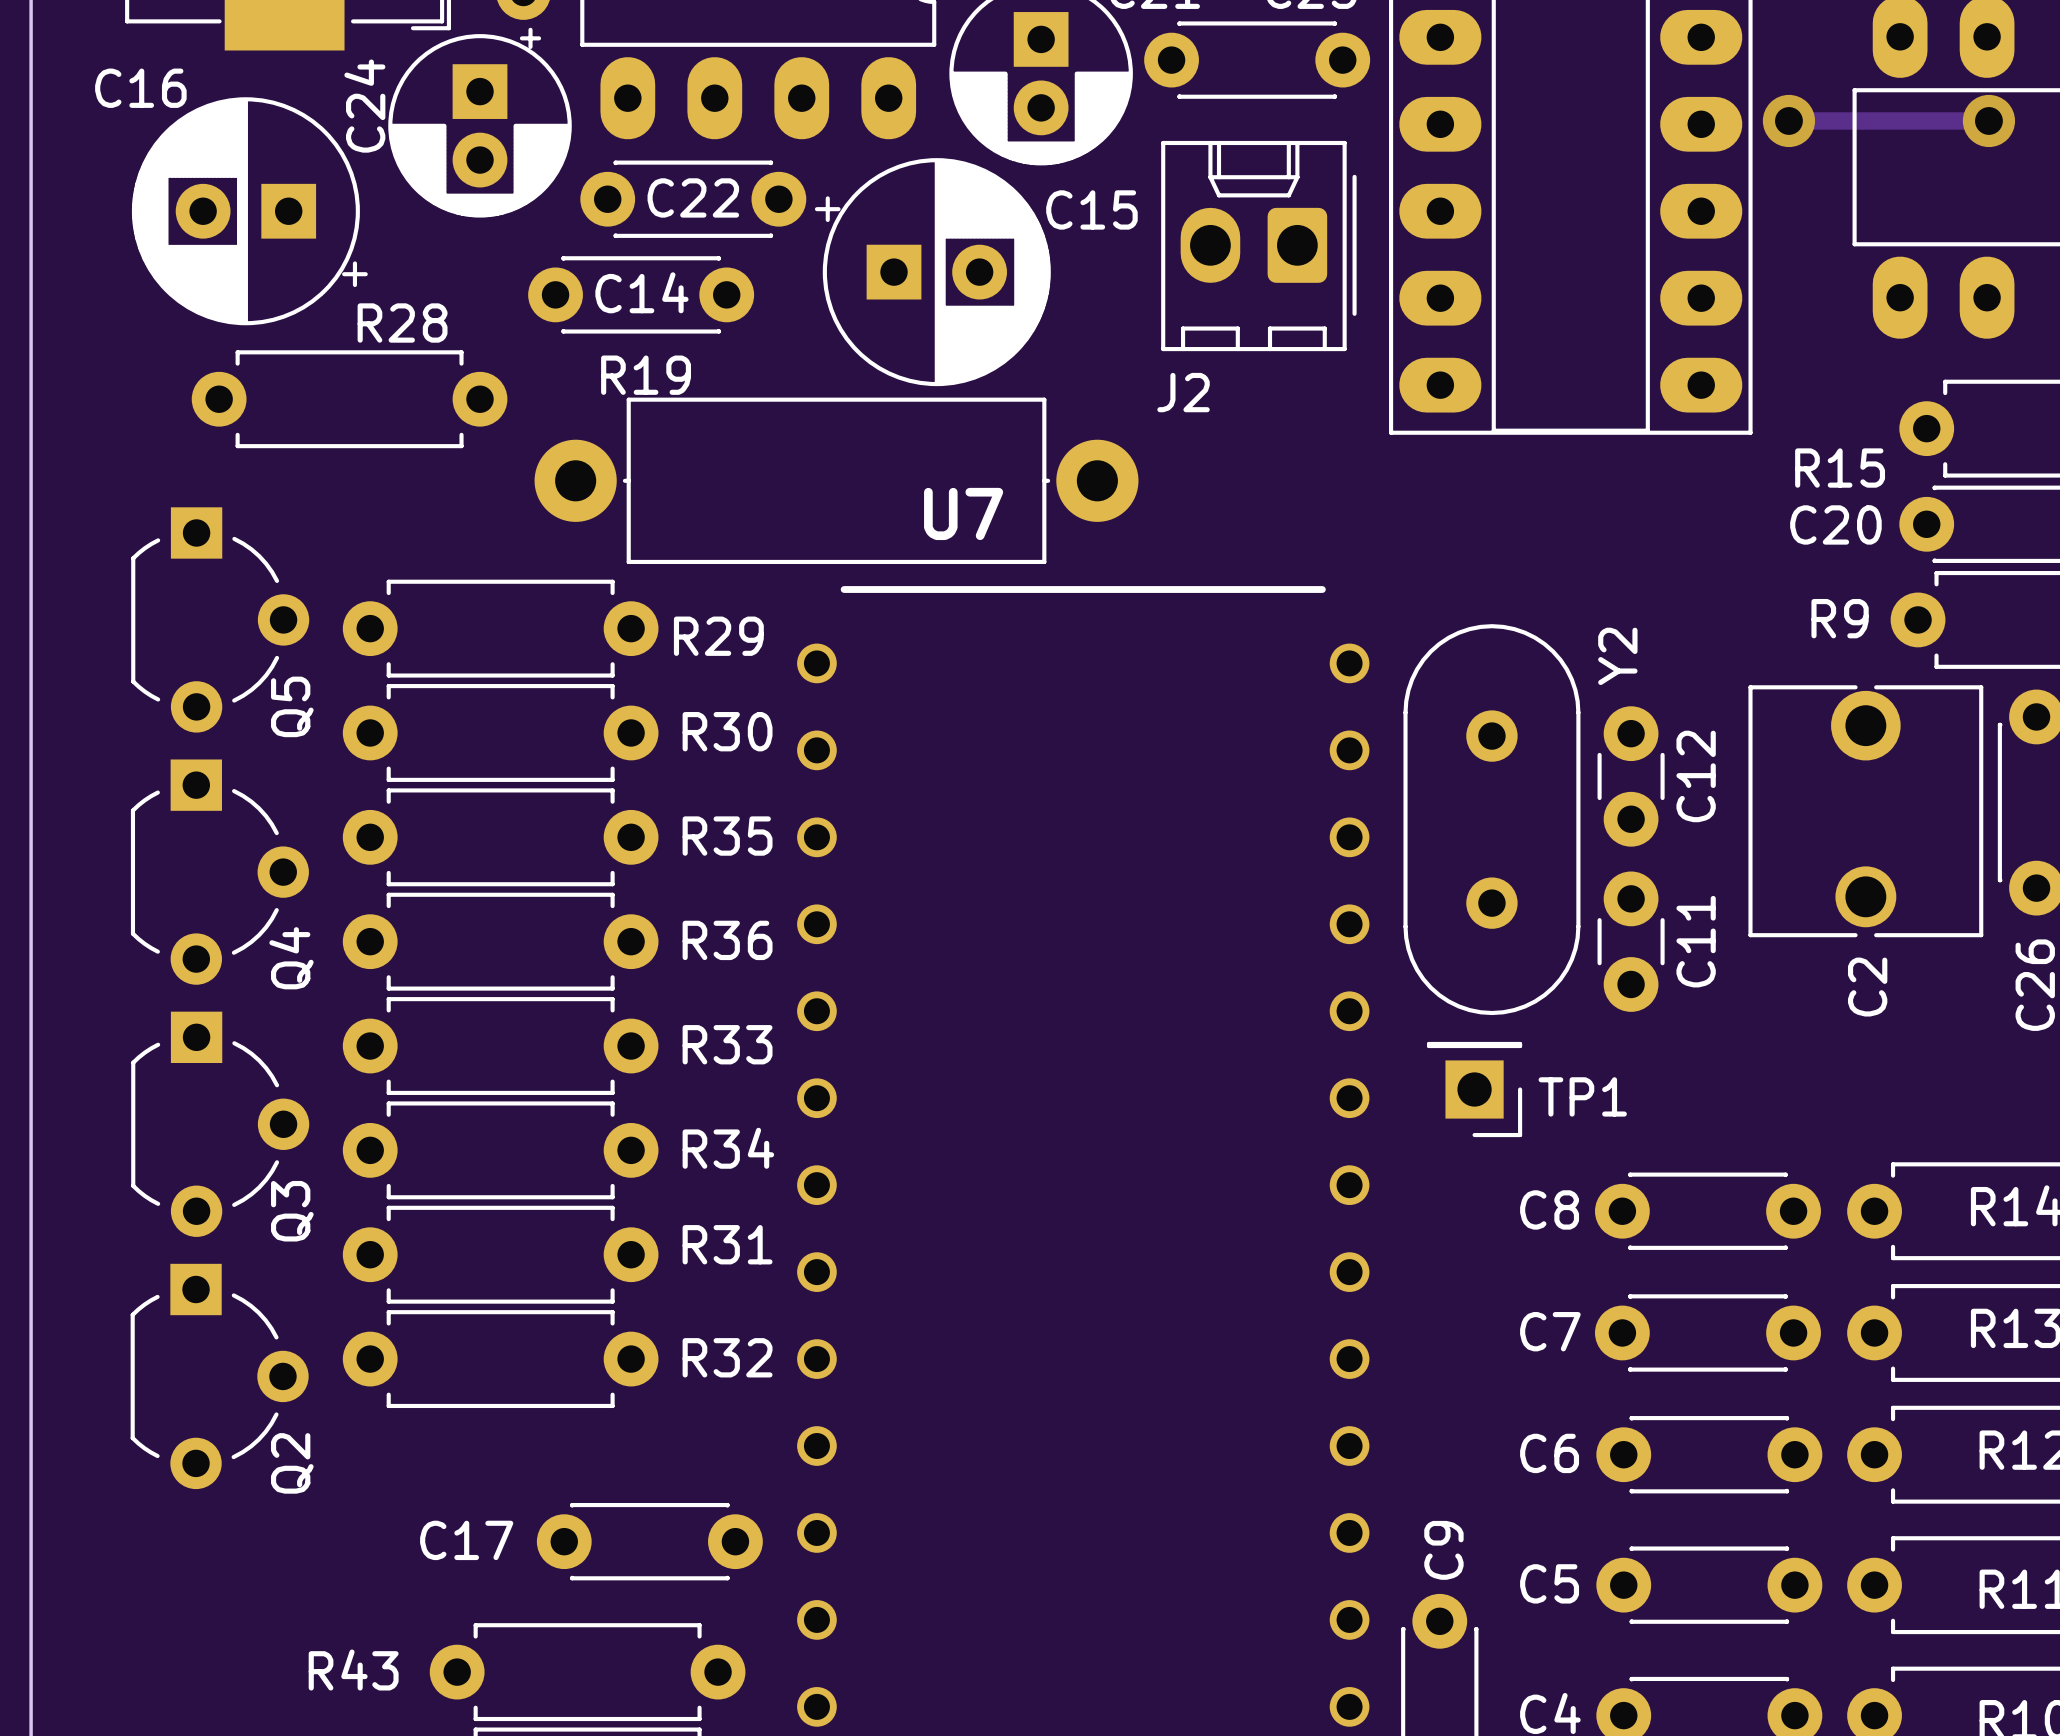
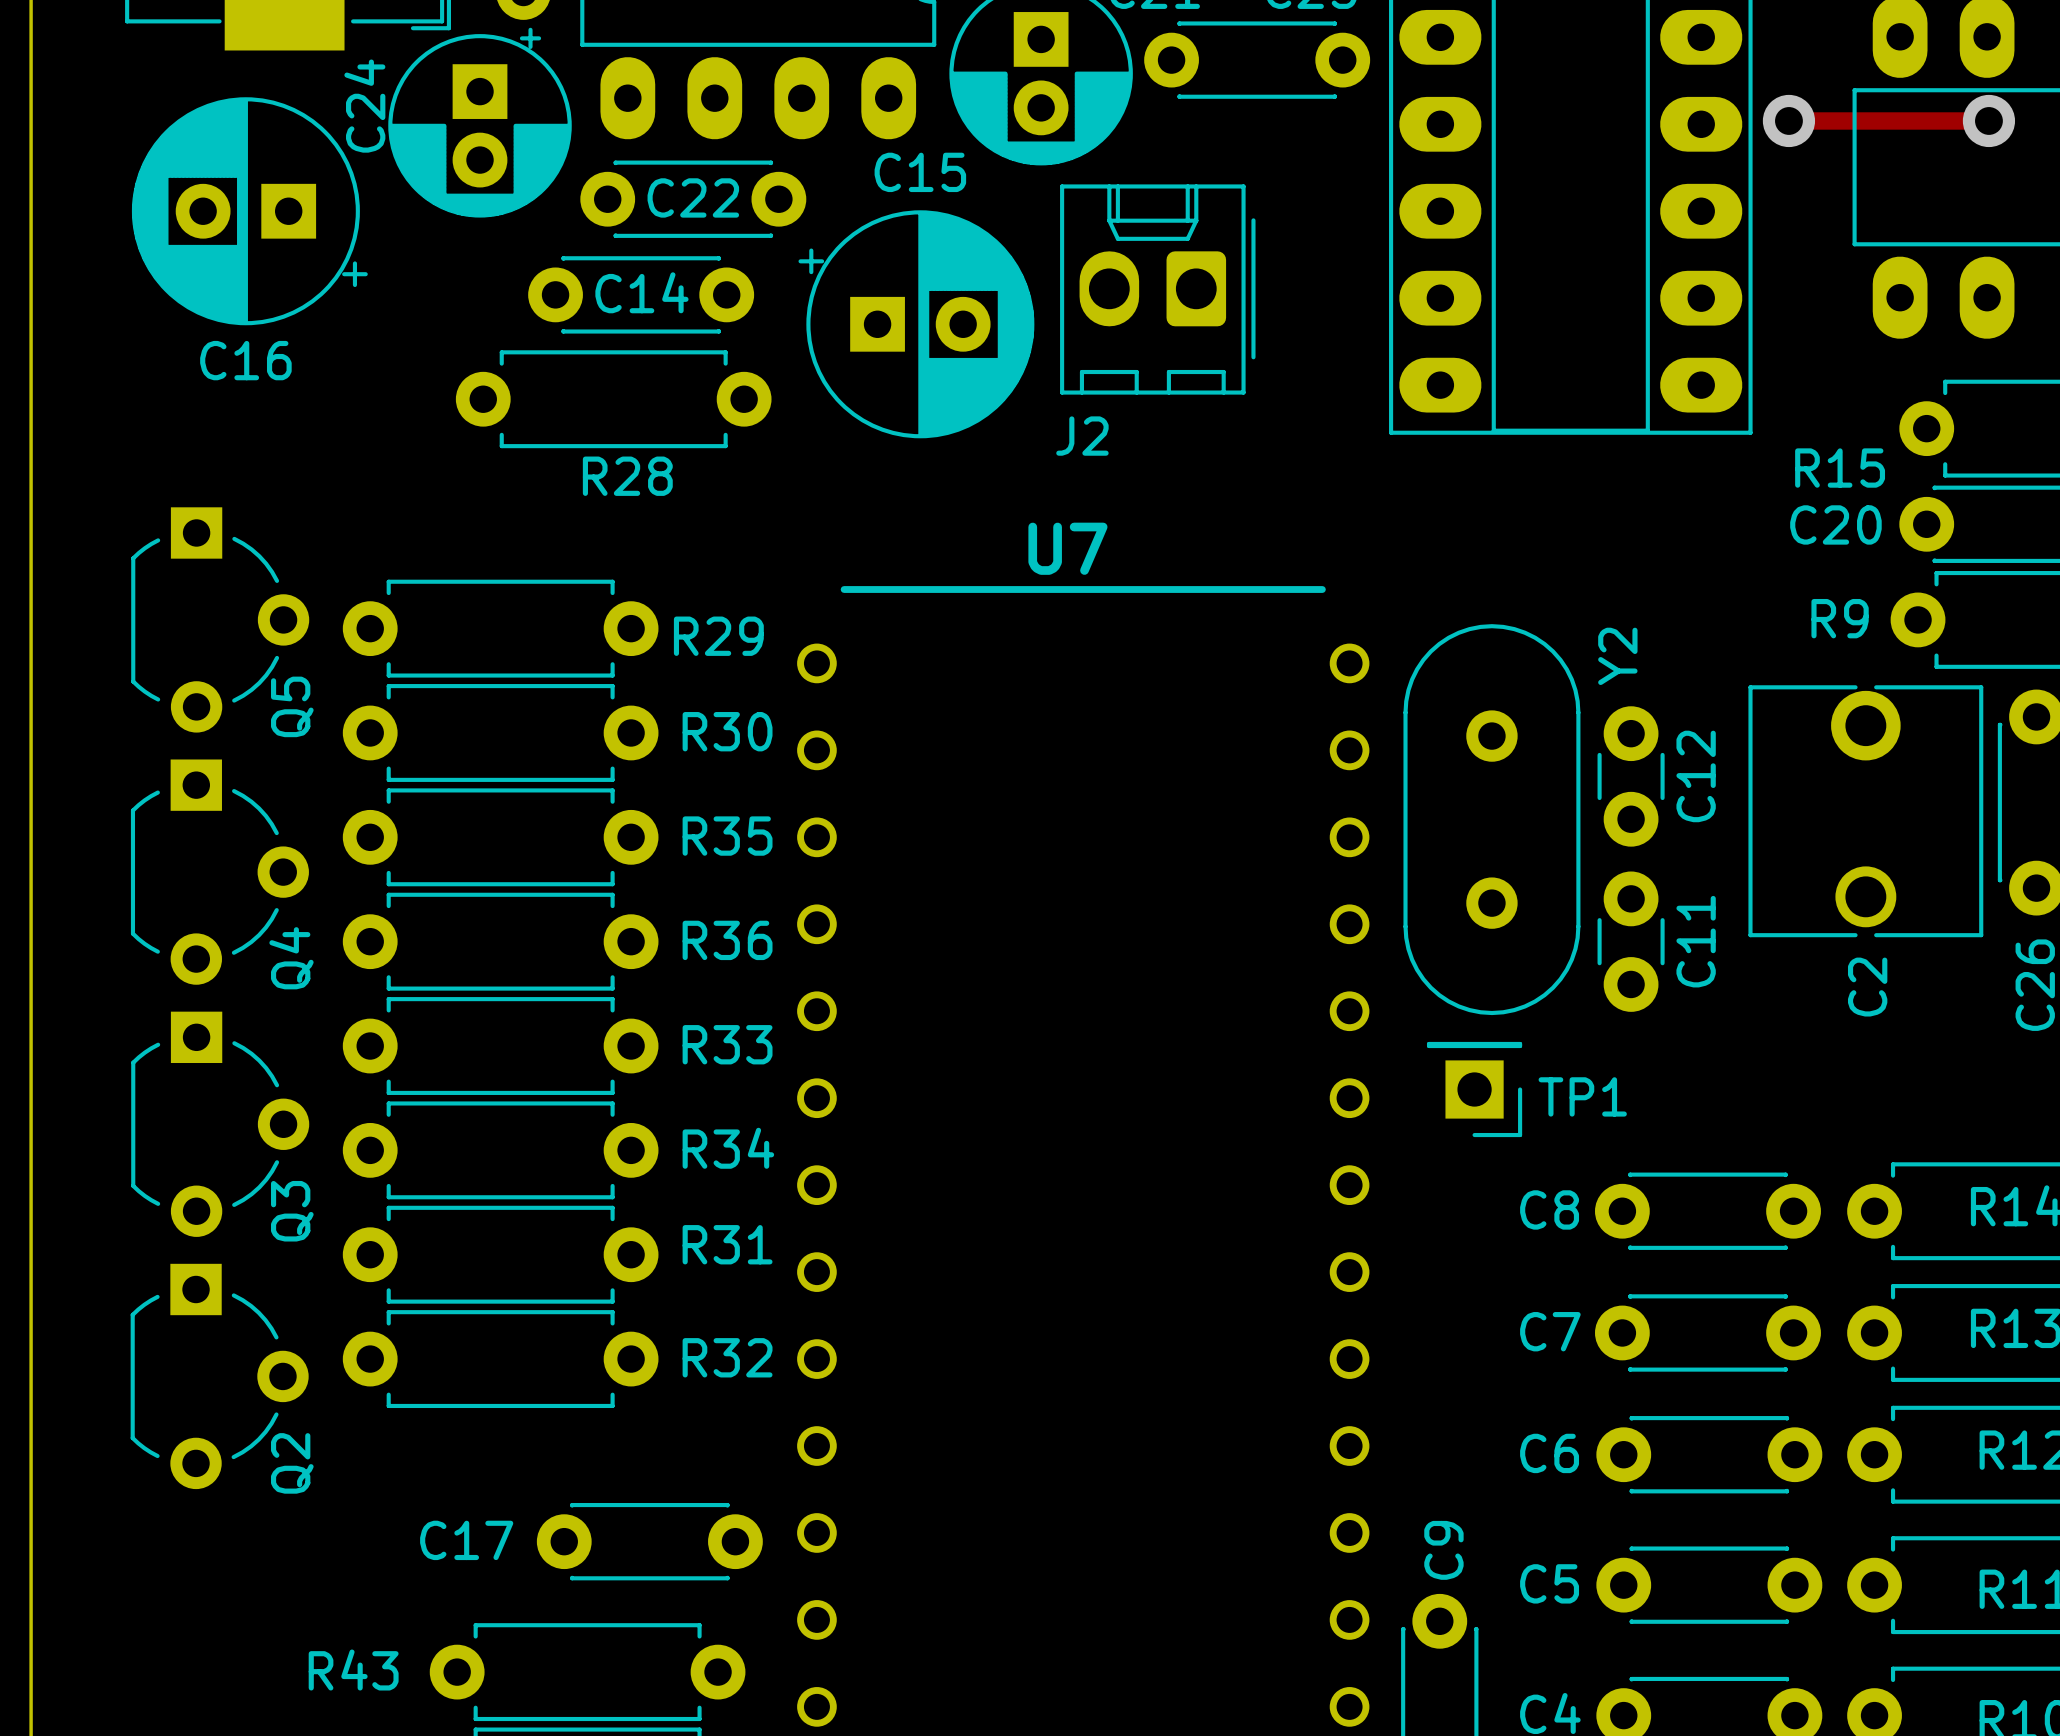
C16 name position: C16 (140, 88) -> C16 (245, 360)
C15 name position: C15 (1091, 209) -> C15 (920, 172)
J2 position: (1258, 246) -> (1157, 289)
C15 position: (932, 272) -> (916, 324)
R28 name position: R28 (402, 323) -> R28 (627, 476)
R28 position: (349, 399) -> (613, 399)
R19: (836, 480) -> none
U7 name position: U7 (963, 513) -> U7 (1067, 548)

